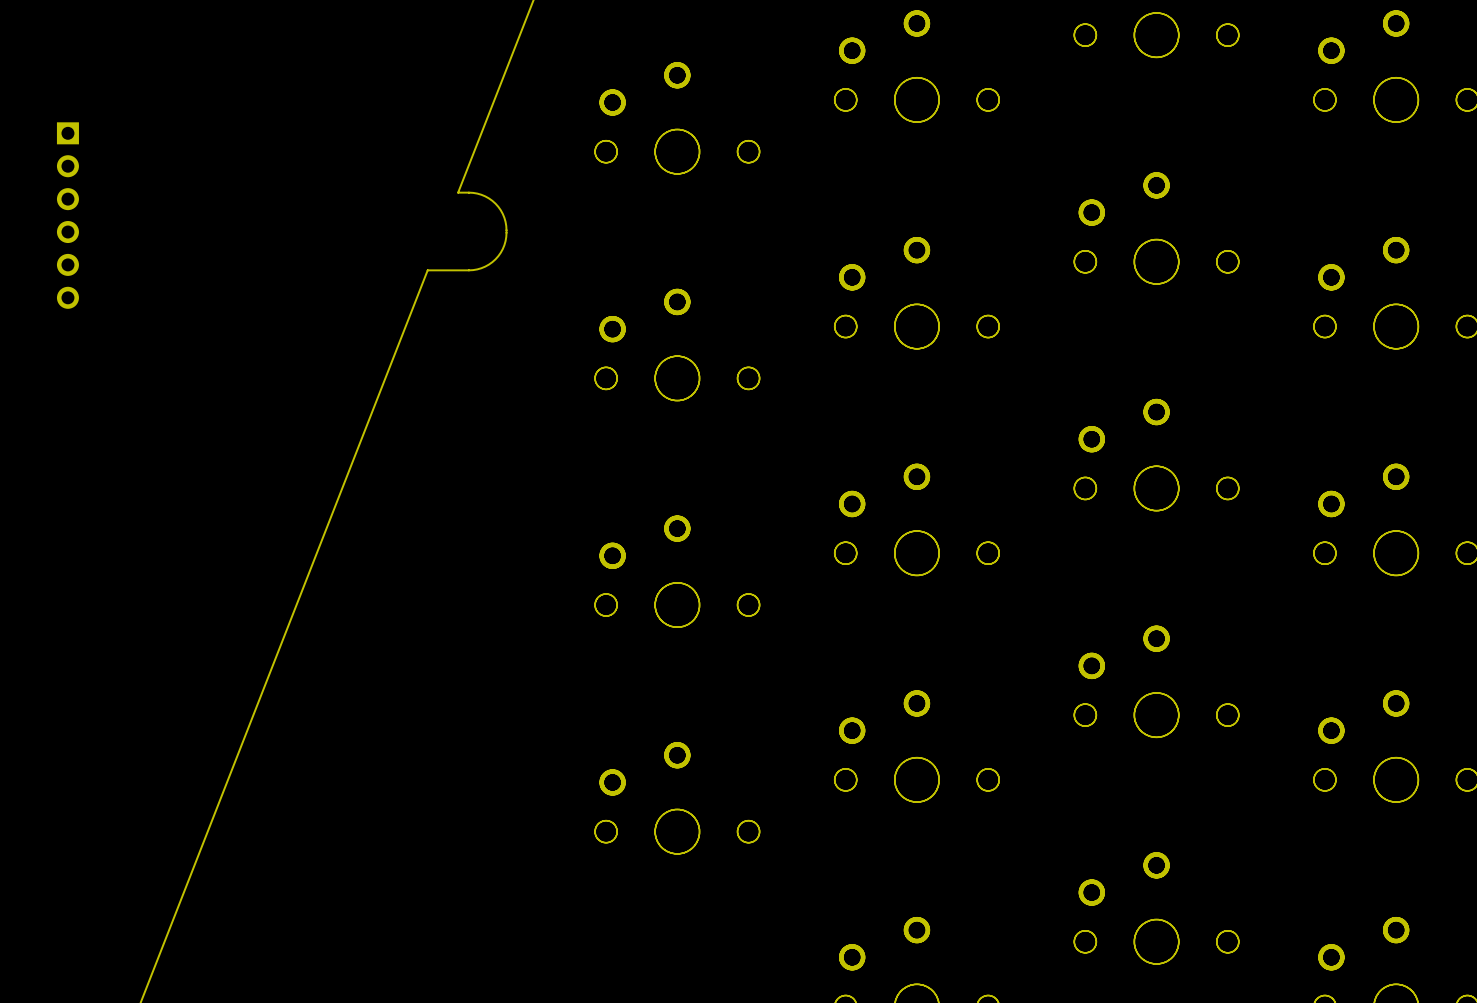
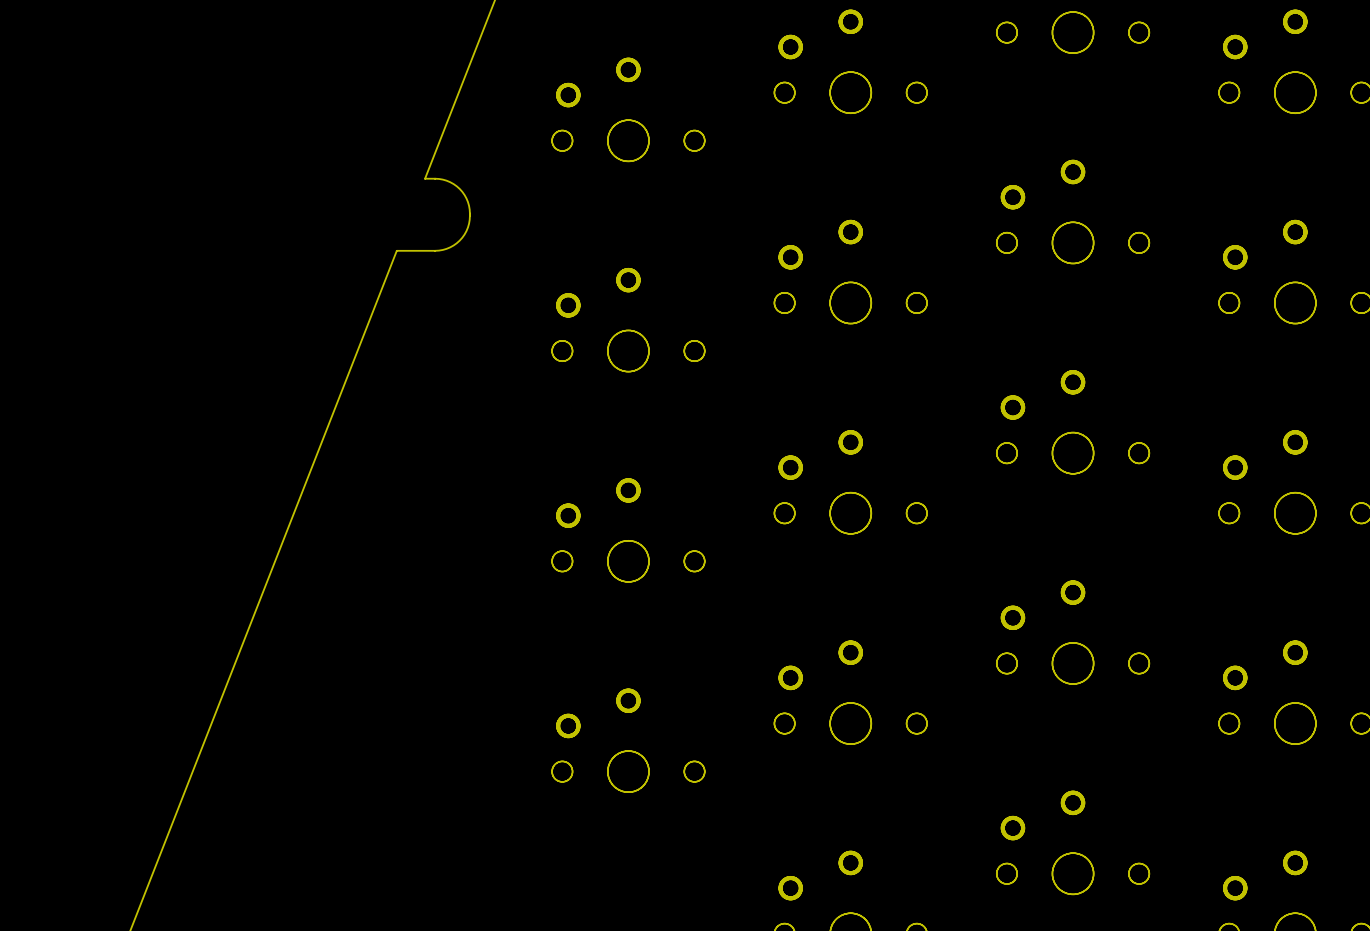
part: (67, 215) -> none

